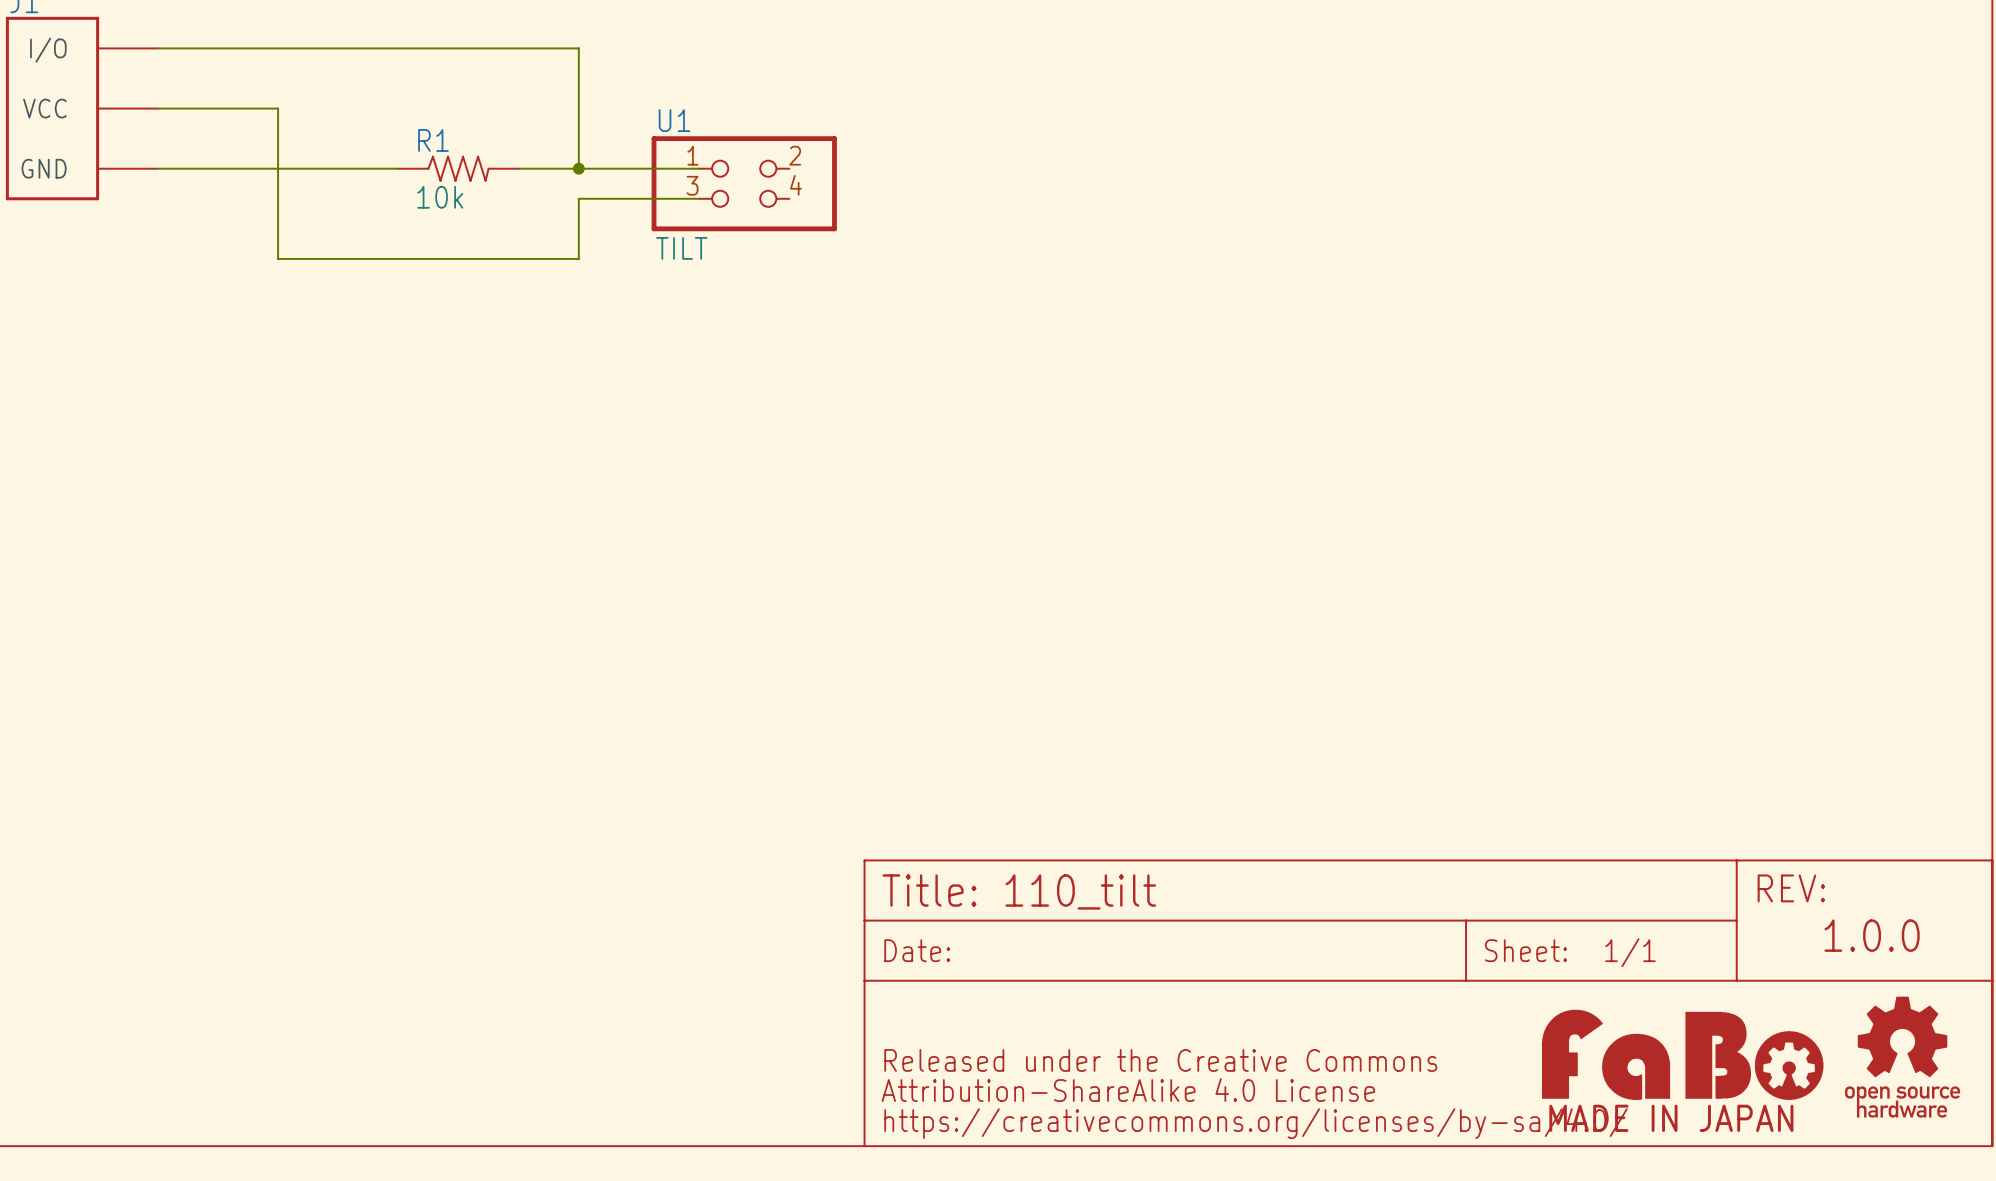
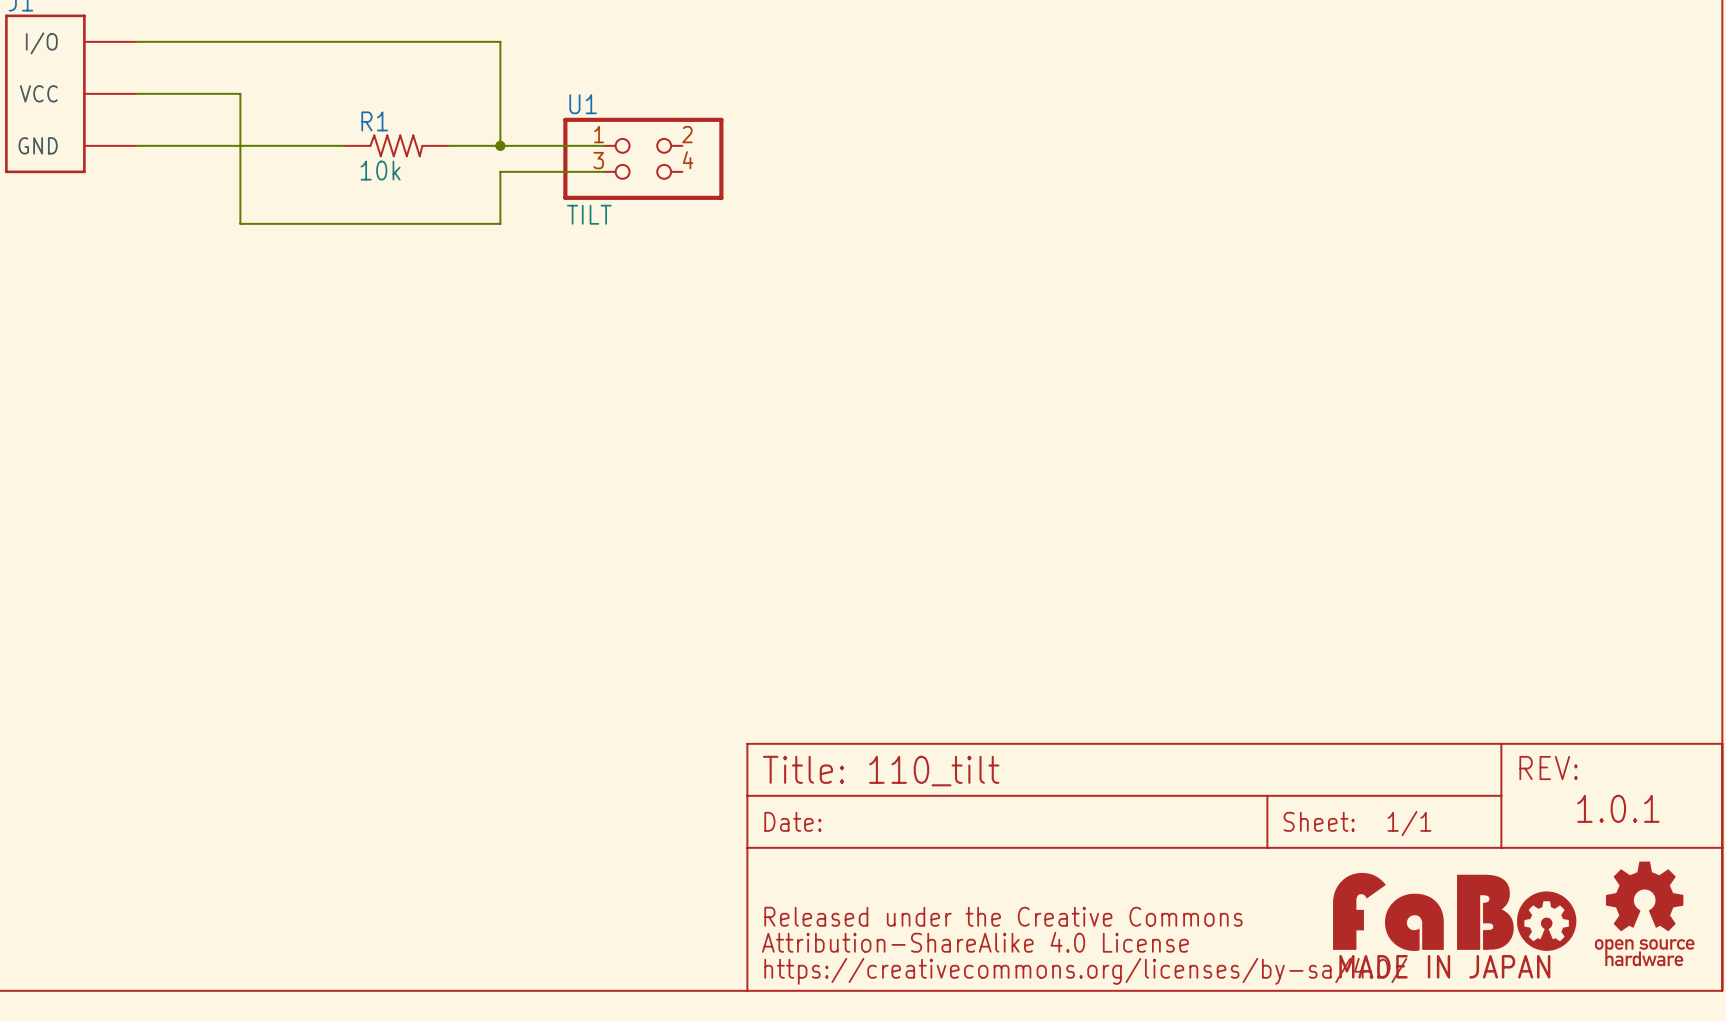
text: 1.0.0 (1872, 935) -> 1.0.1 (1618, 808)

